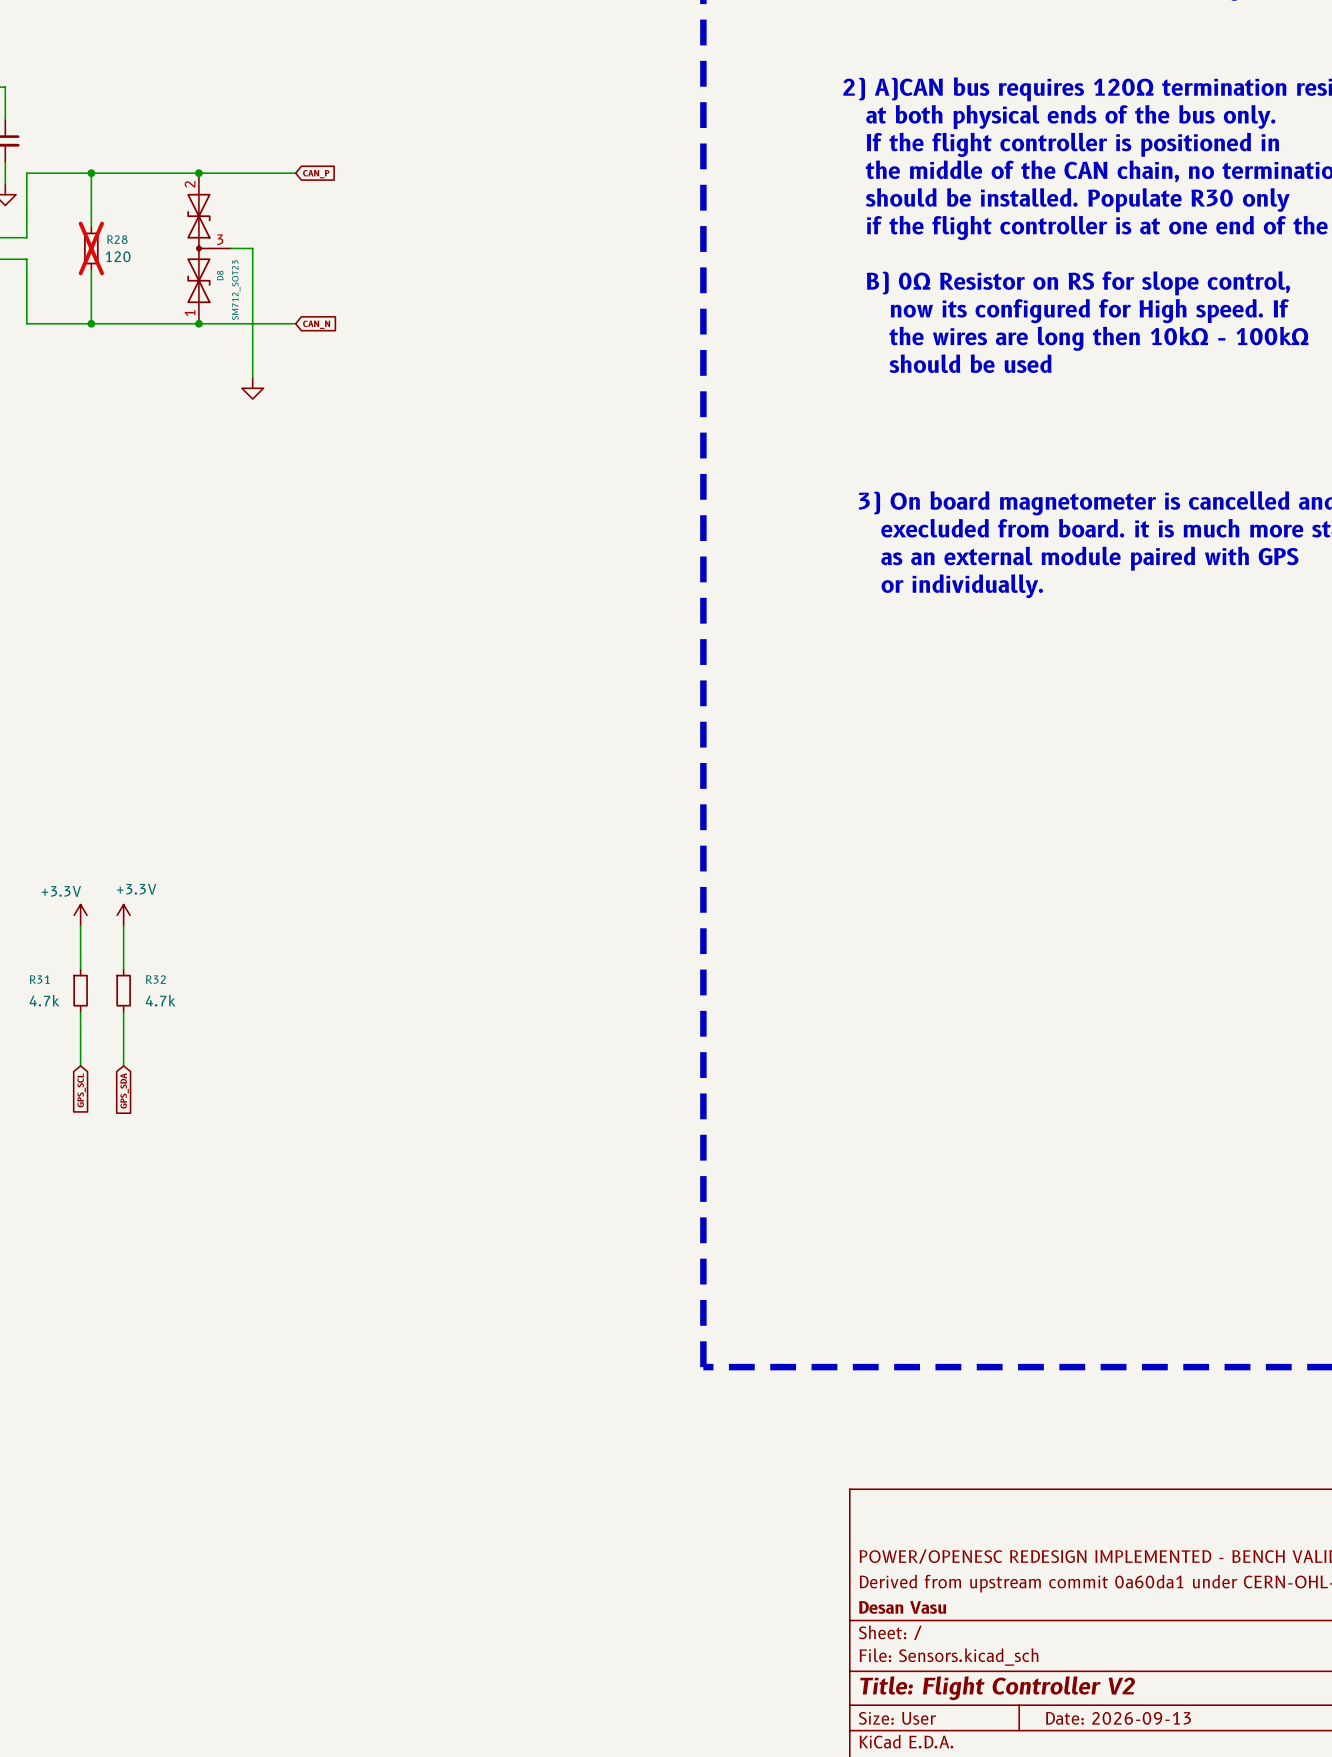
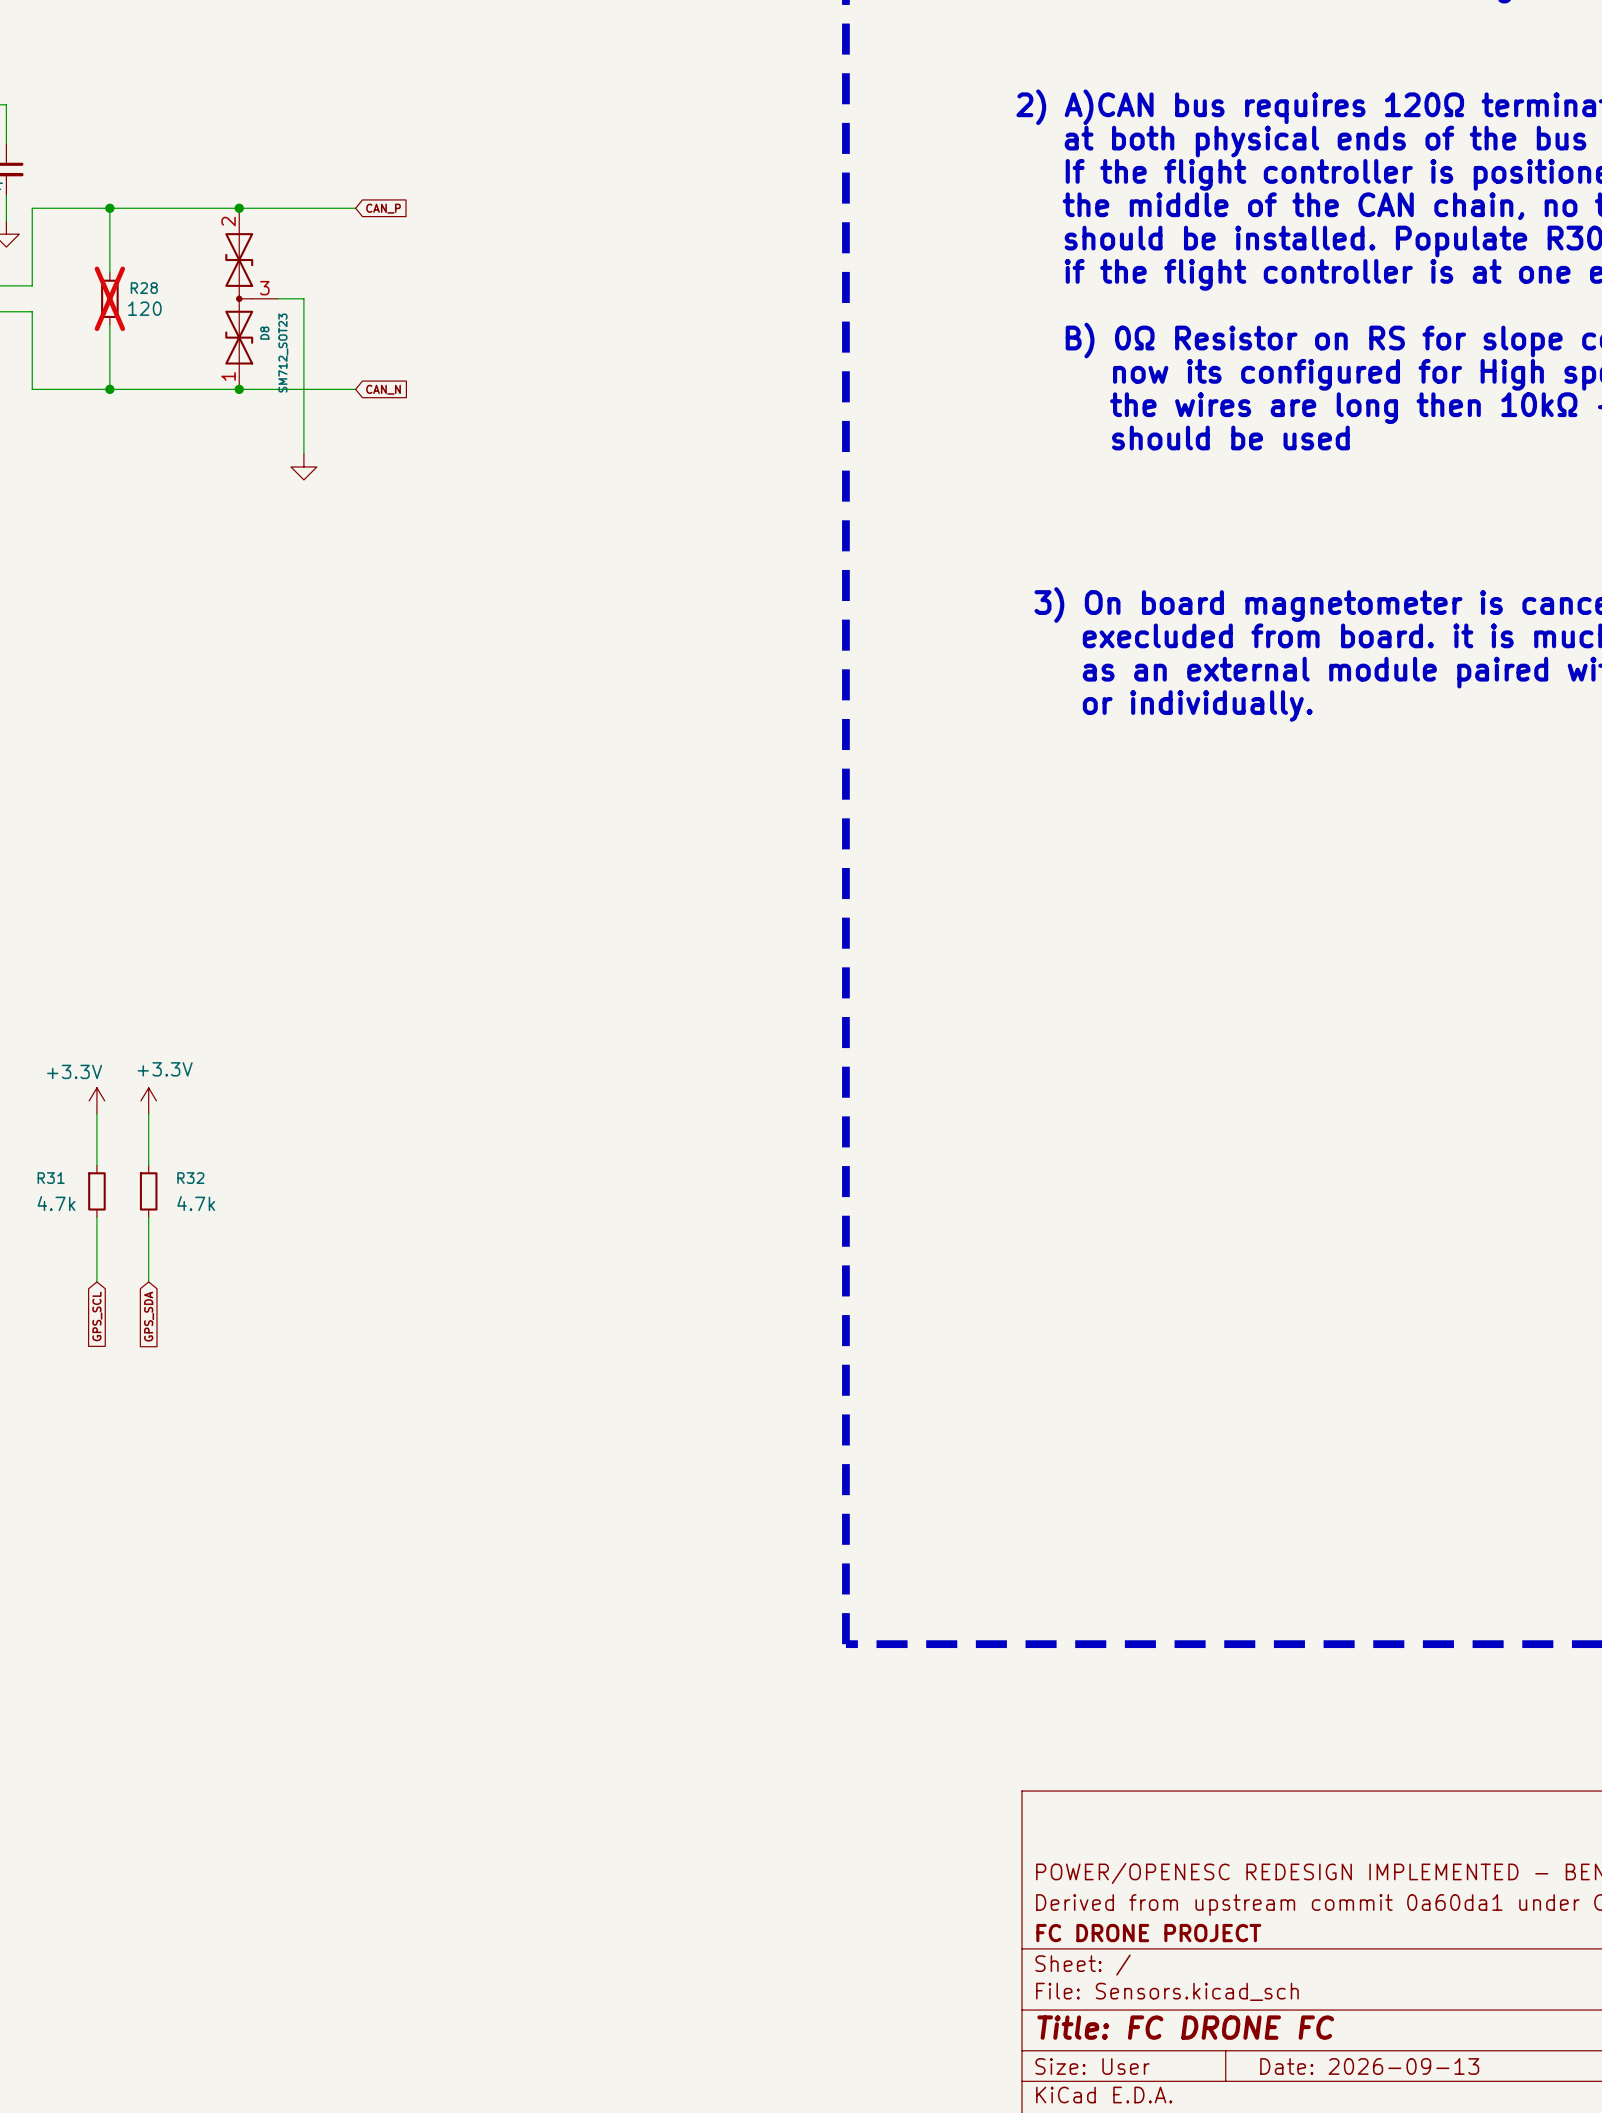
title block: Desan Vasu (902, 1607) -> FC DRONE PROJECT (1148, 1933)
title block: Title: Flight Controller V2 (997, 1688) -> Title: FC DRONE FC (1185, 2027)

